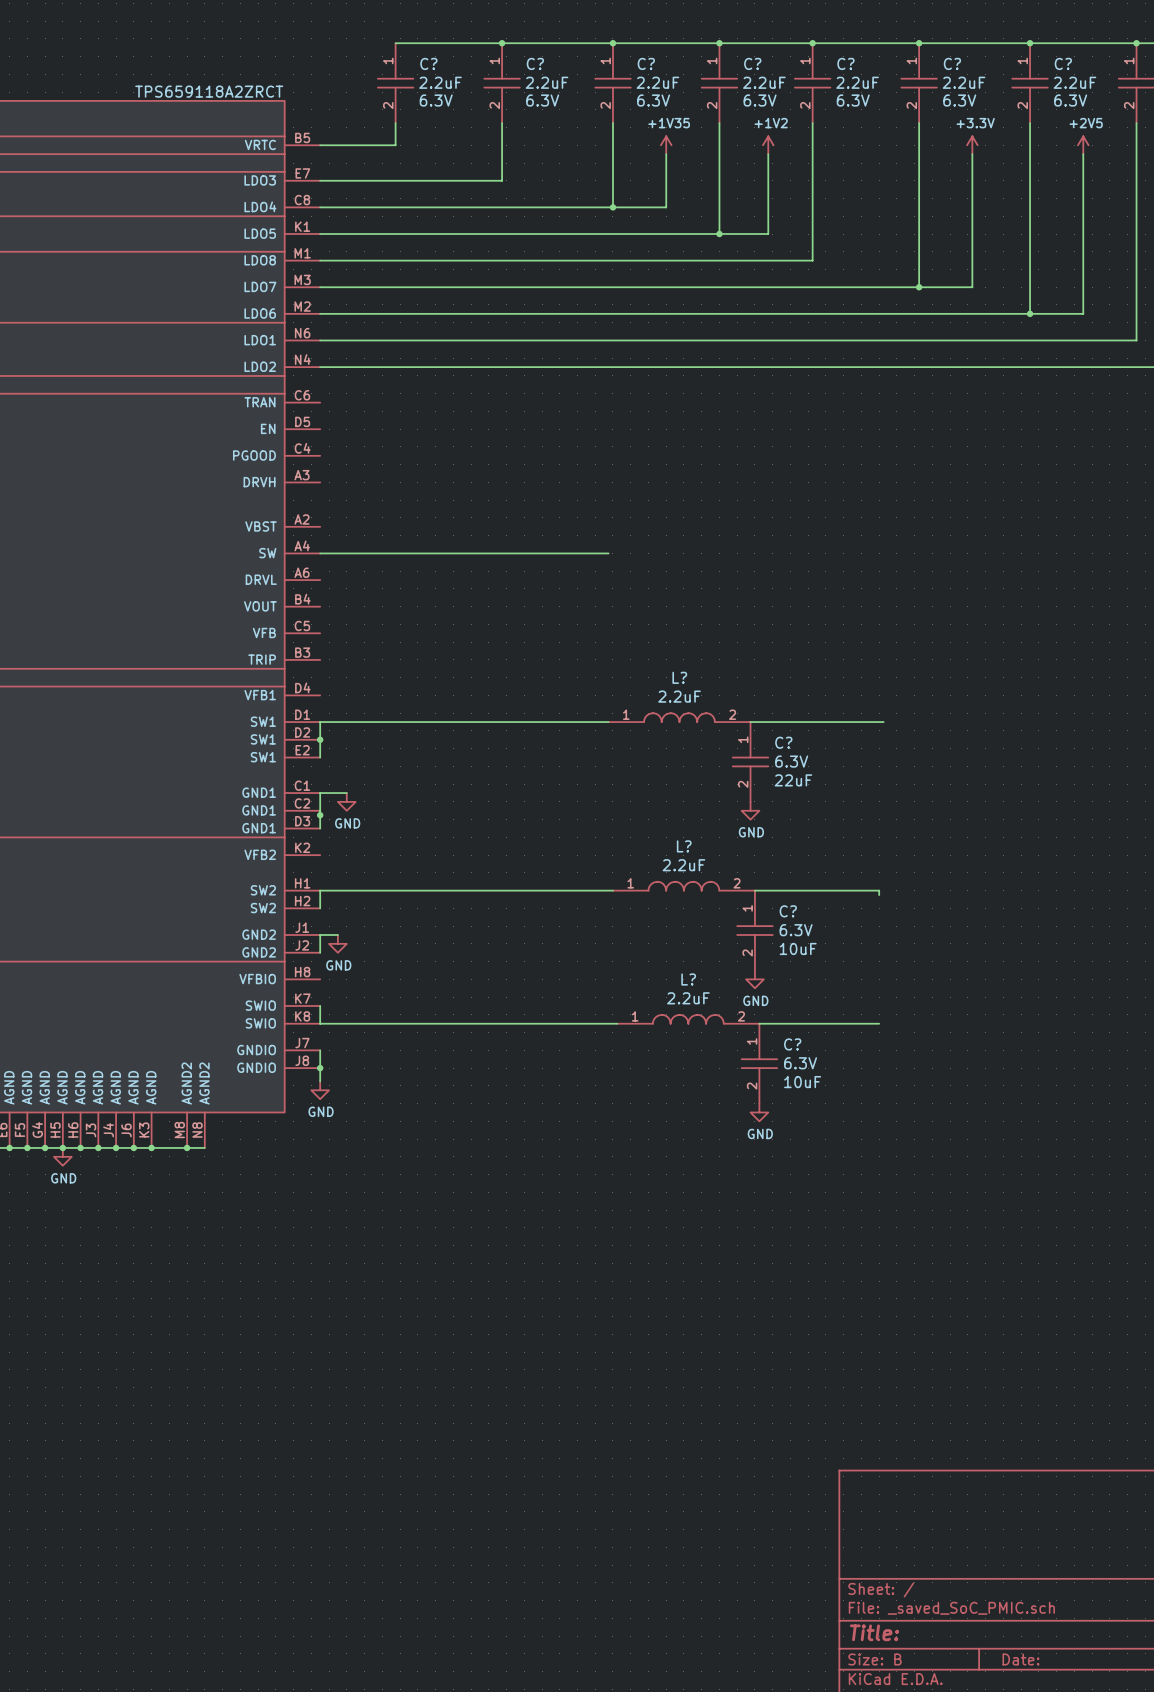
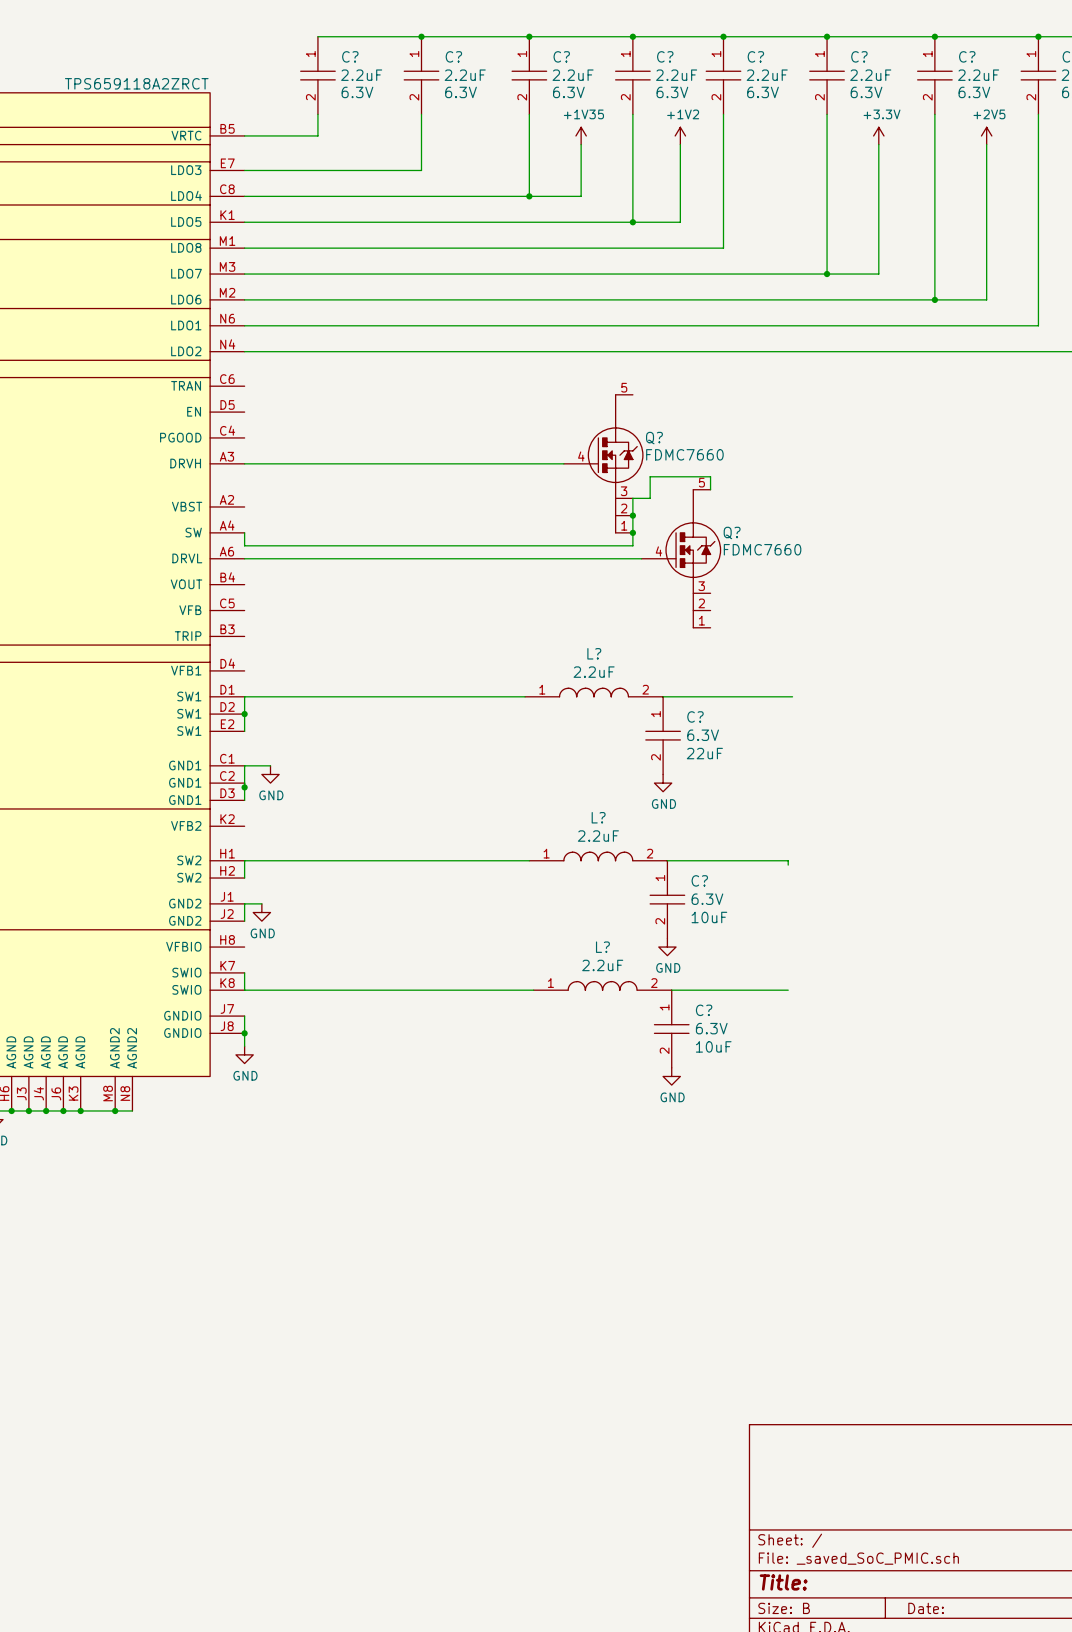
wire: none -> (244, 463) (563, 463)
Q?: none -> FDMC7660 (603, 463)
junction: none -> (632, 515)
wire: (320, 553) (608, 553) -> (244, 532) (244, 545) (632, 545) (632, 498) (650, 498) (650, 476) (710, 476) (710, 489)
junction: none -> (632, 532)
wire: none -> (244, 558) (641, 558)
Q?: none -> FDMC7660 (681, 558)

